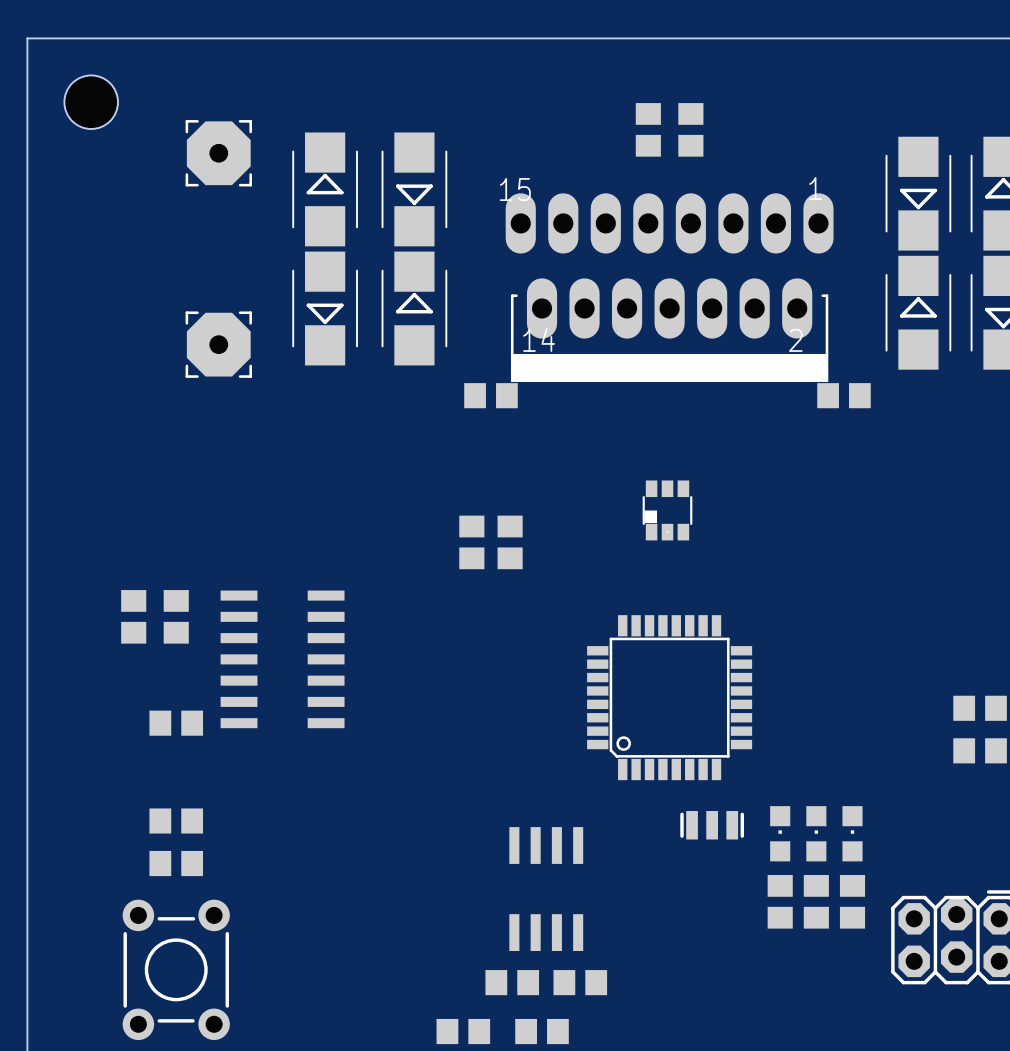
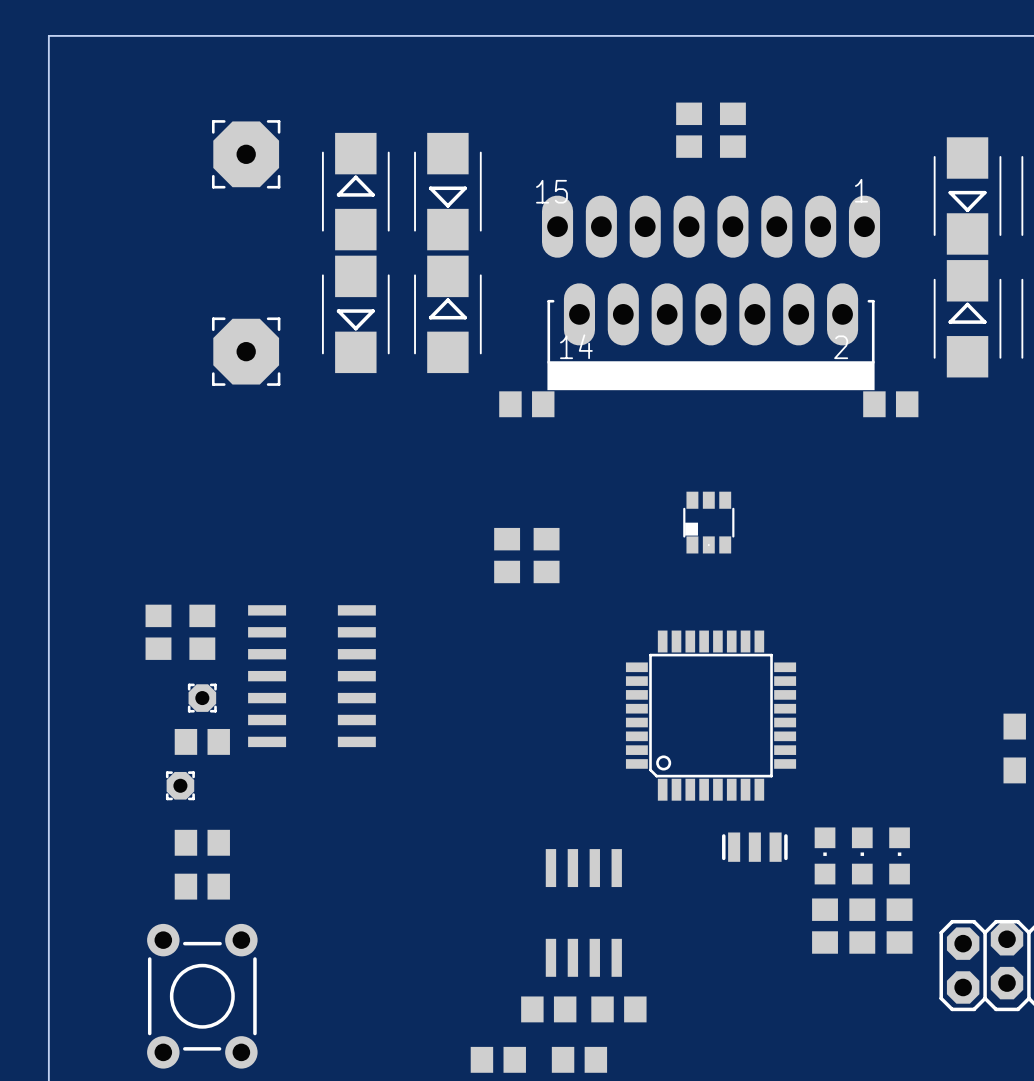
hole: (91, 102) -> none
part: none -> (202, 698)
part: none -> (180, 785)

